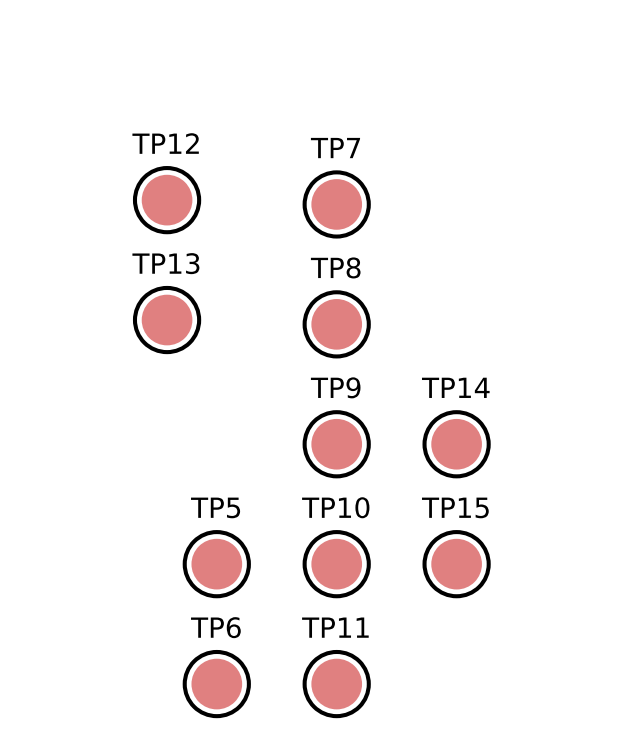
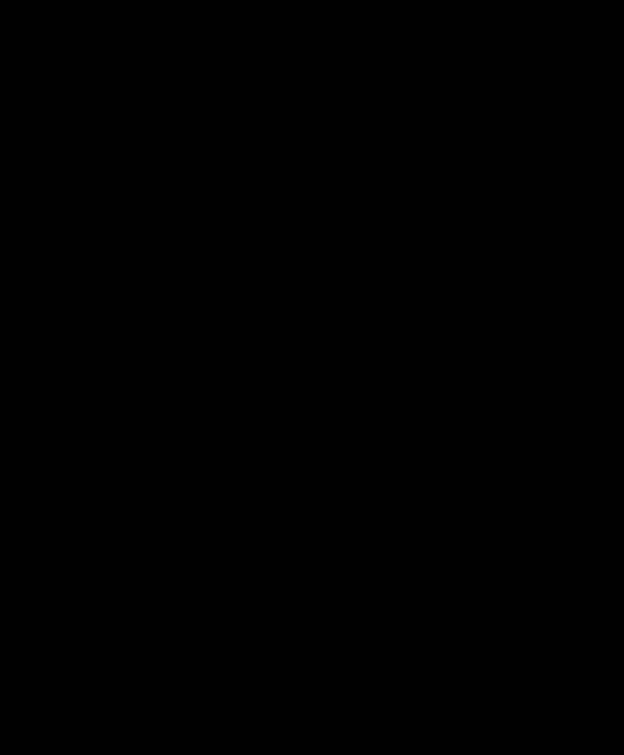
TP12: (167, 200) -> none
TP7: (336, 204) -> none
TP13: (167, 320) -> none
TP8: (336, 324) -> none
TP9: (336, 444) -> none
TP14: (456, 444) -> none
TP5: (216, 564) -> none
TP10: (336, 564) -> none
TP15: (456, 564) -> none
TP6: (216, 684) -> none
TP11: (336, 684) -> none

